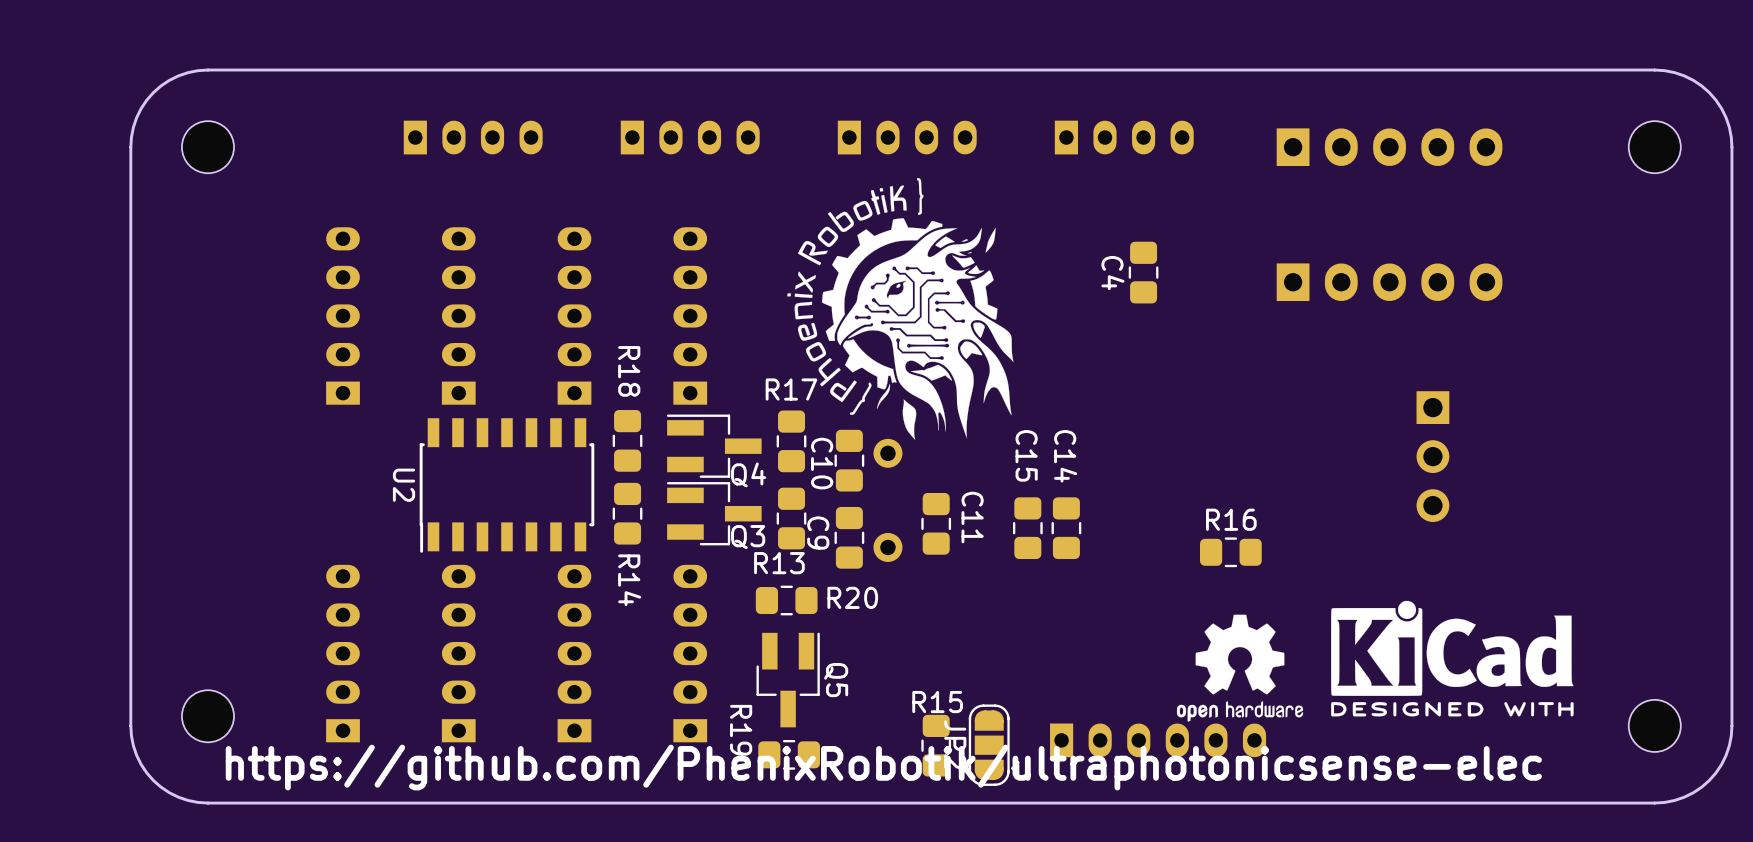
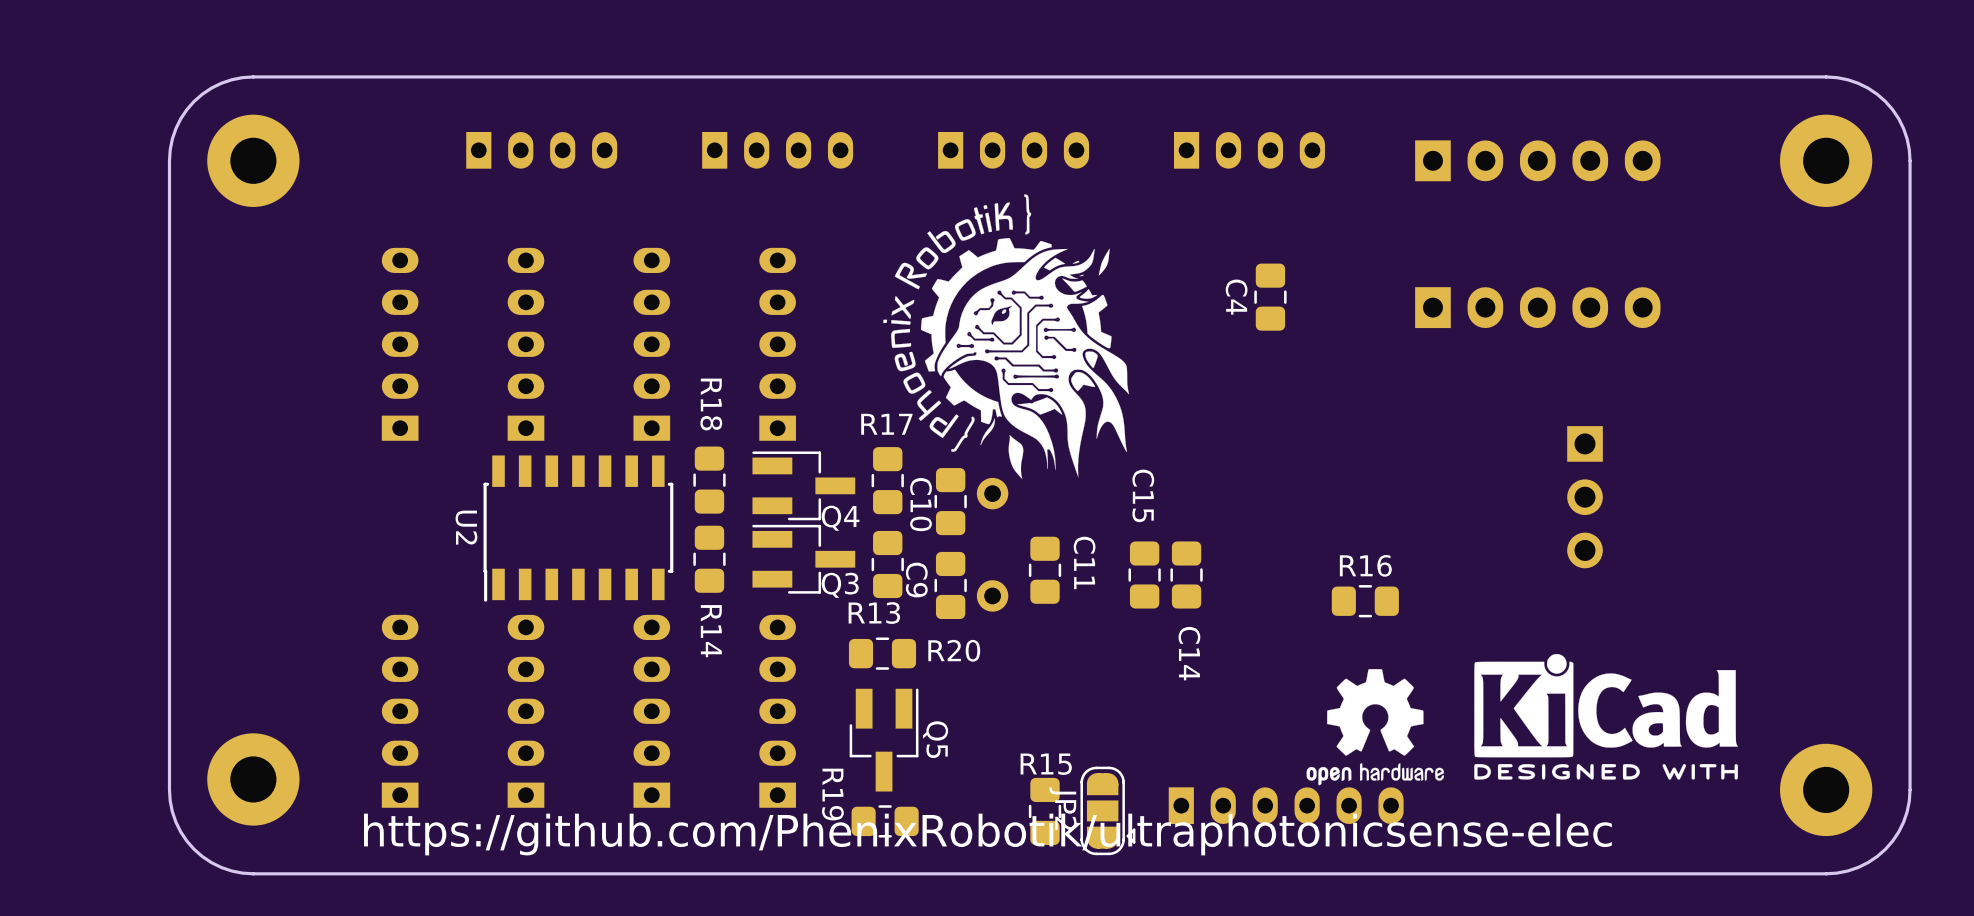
part footprint: [181, 121, 235, 174] -> [207, 114, 300, 207]
part footprint: [1628, 121, 1681, 174] -> [1780, 114, 1873, 207]
C14 name position: C14 (1065, 456) -> C14 (1189, 653)
part footprint: [181, 690, 235, 743] -> [207, 733, 300, 826]
part footprint: [1628, 699, 1681, 752] -> [1780, 743, 1873, 837]

